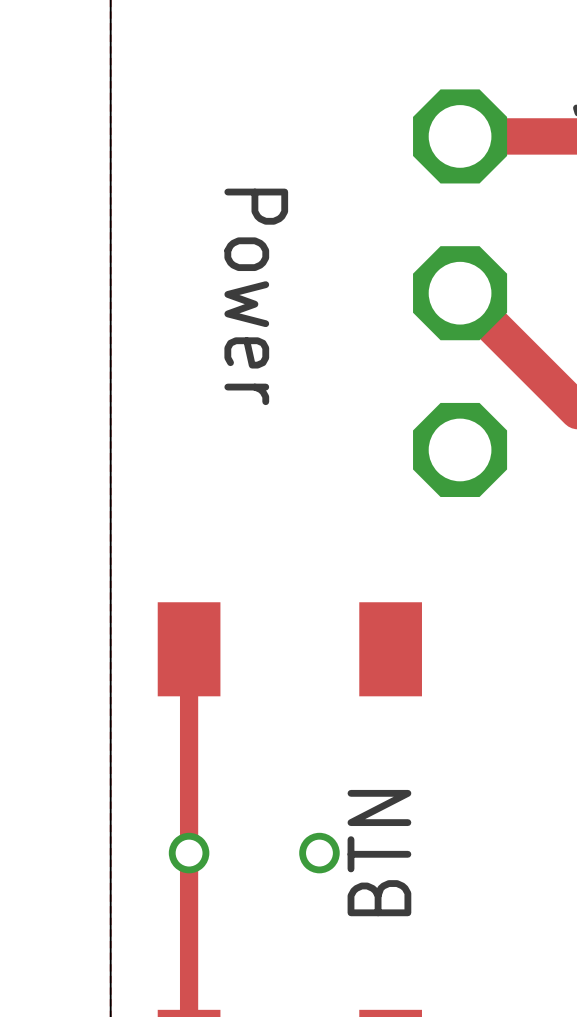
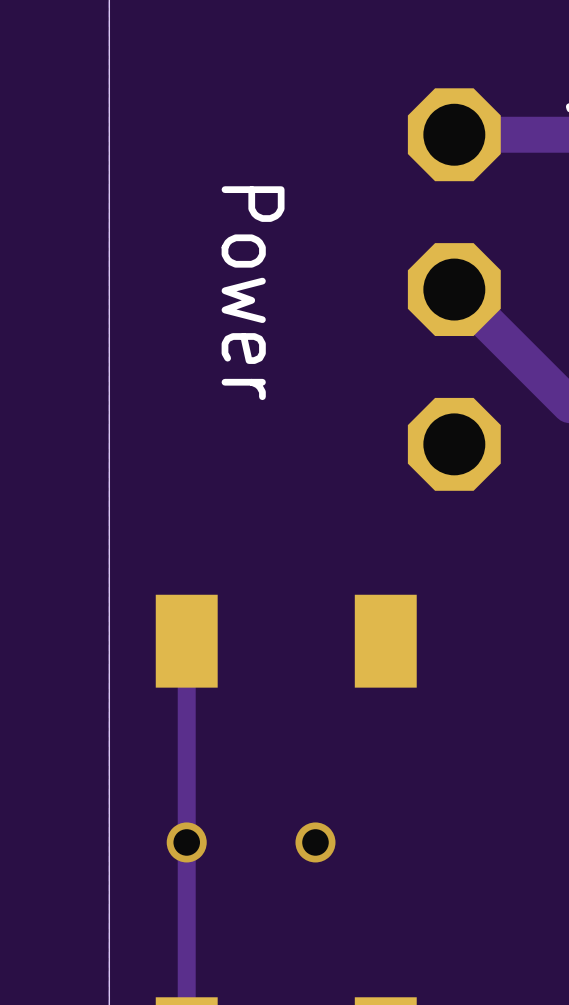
text: BTN (379, 853) -> none

